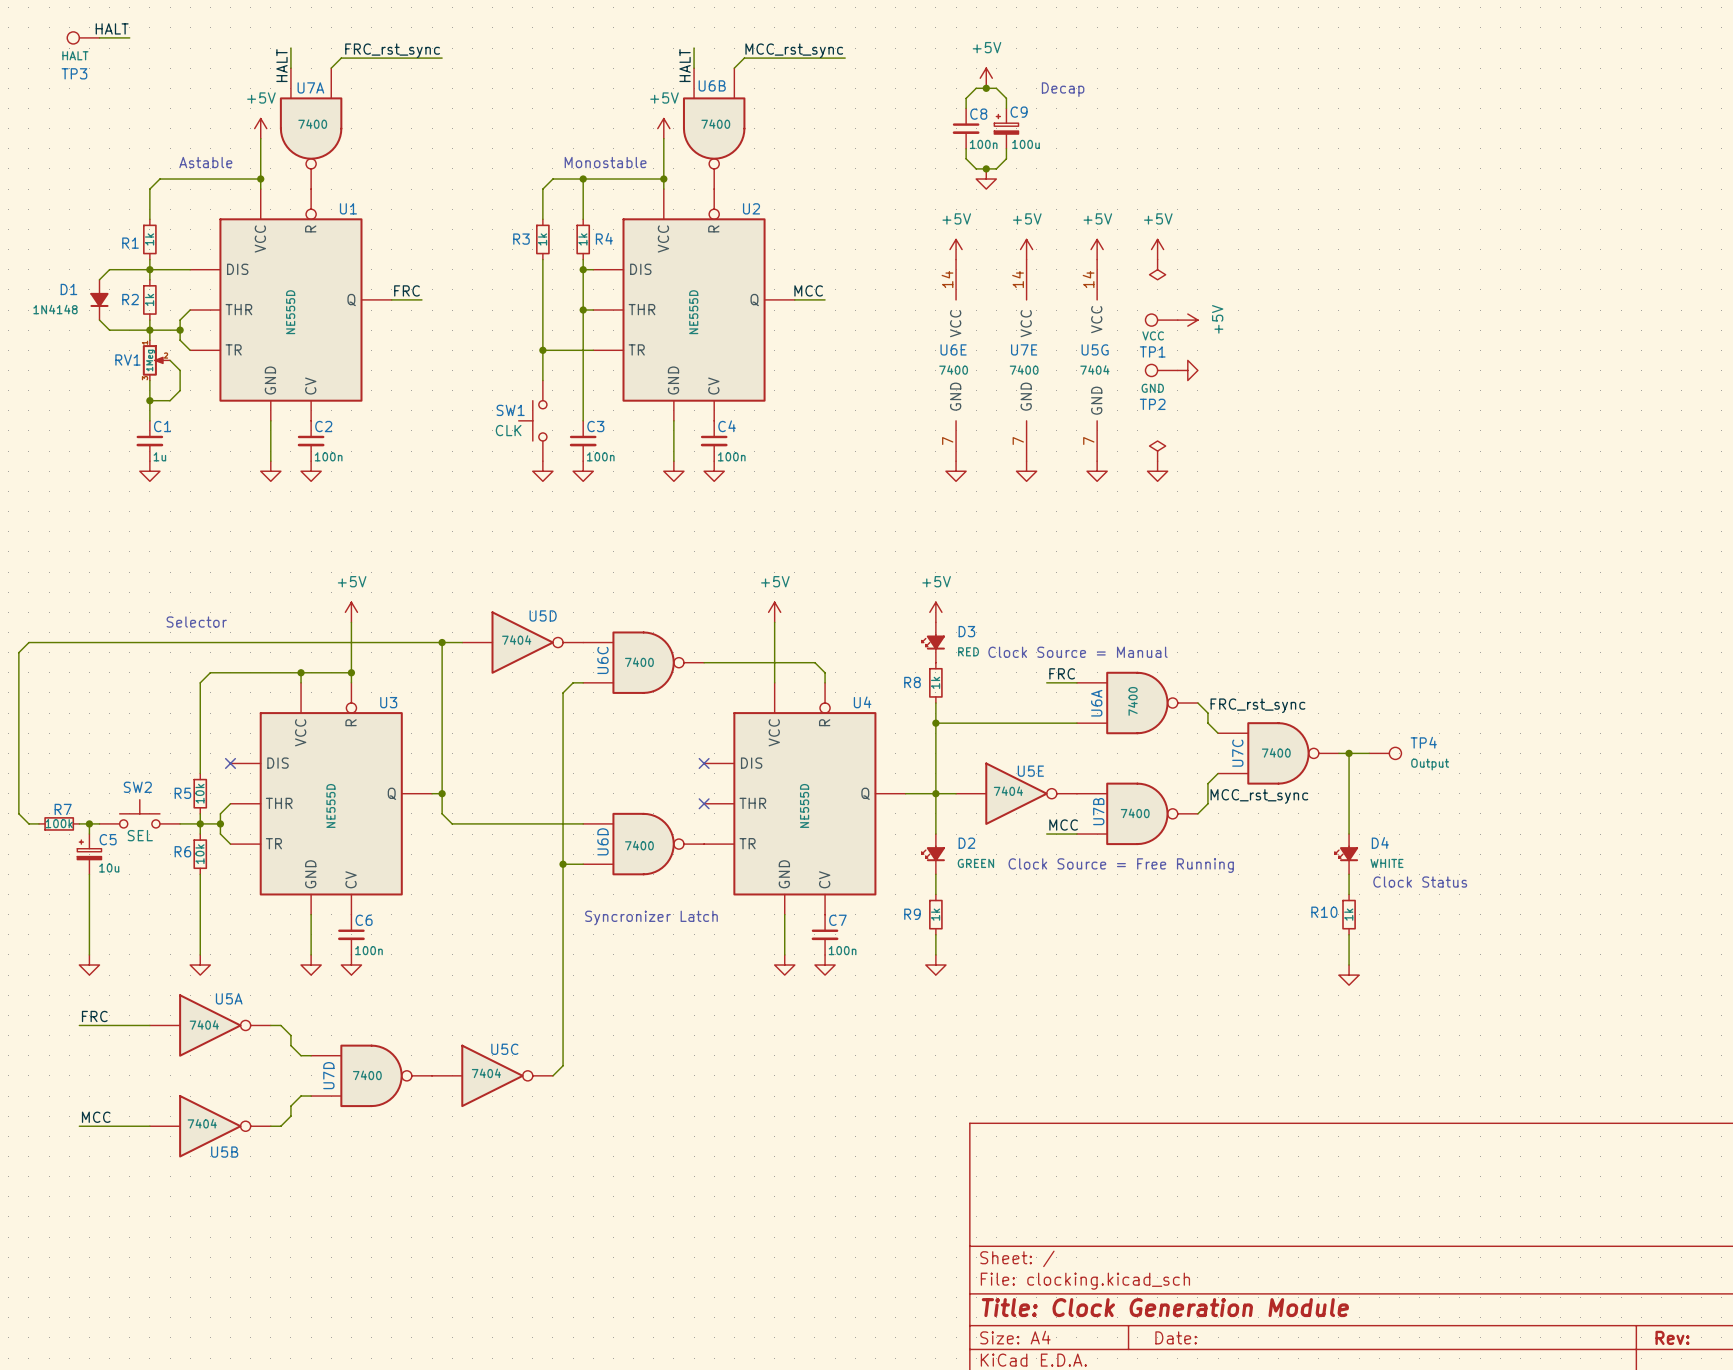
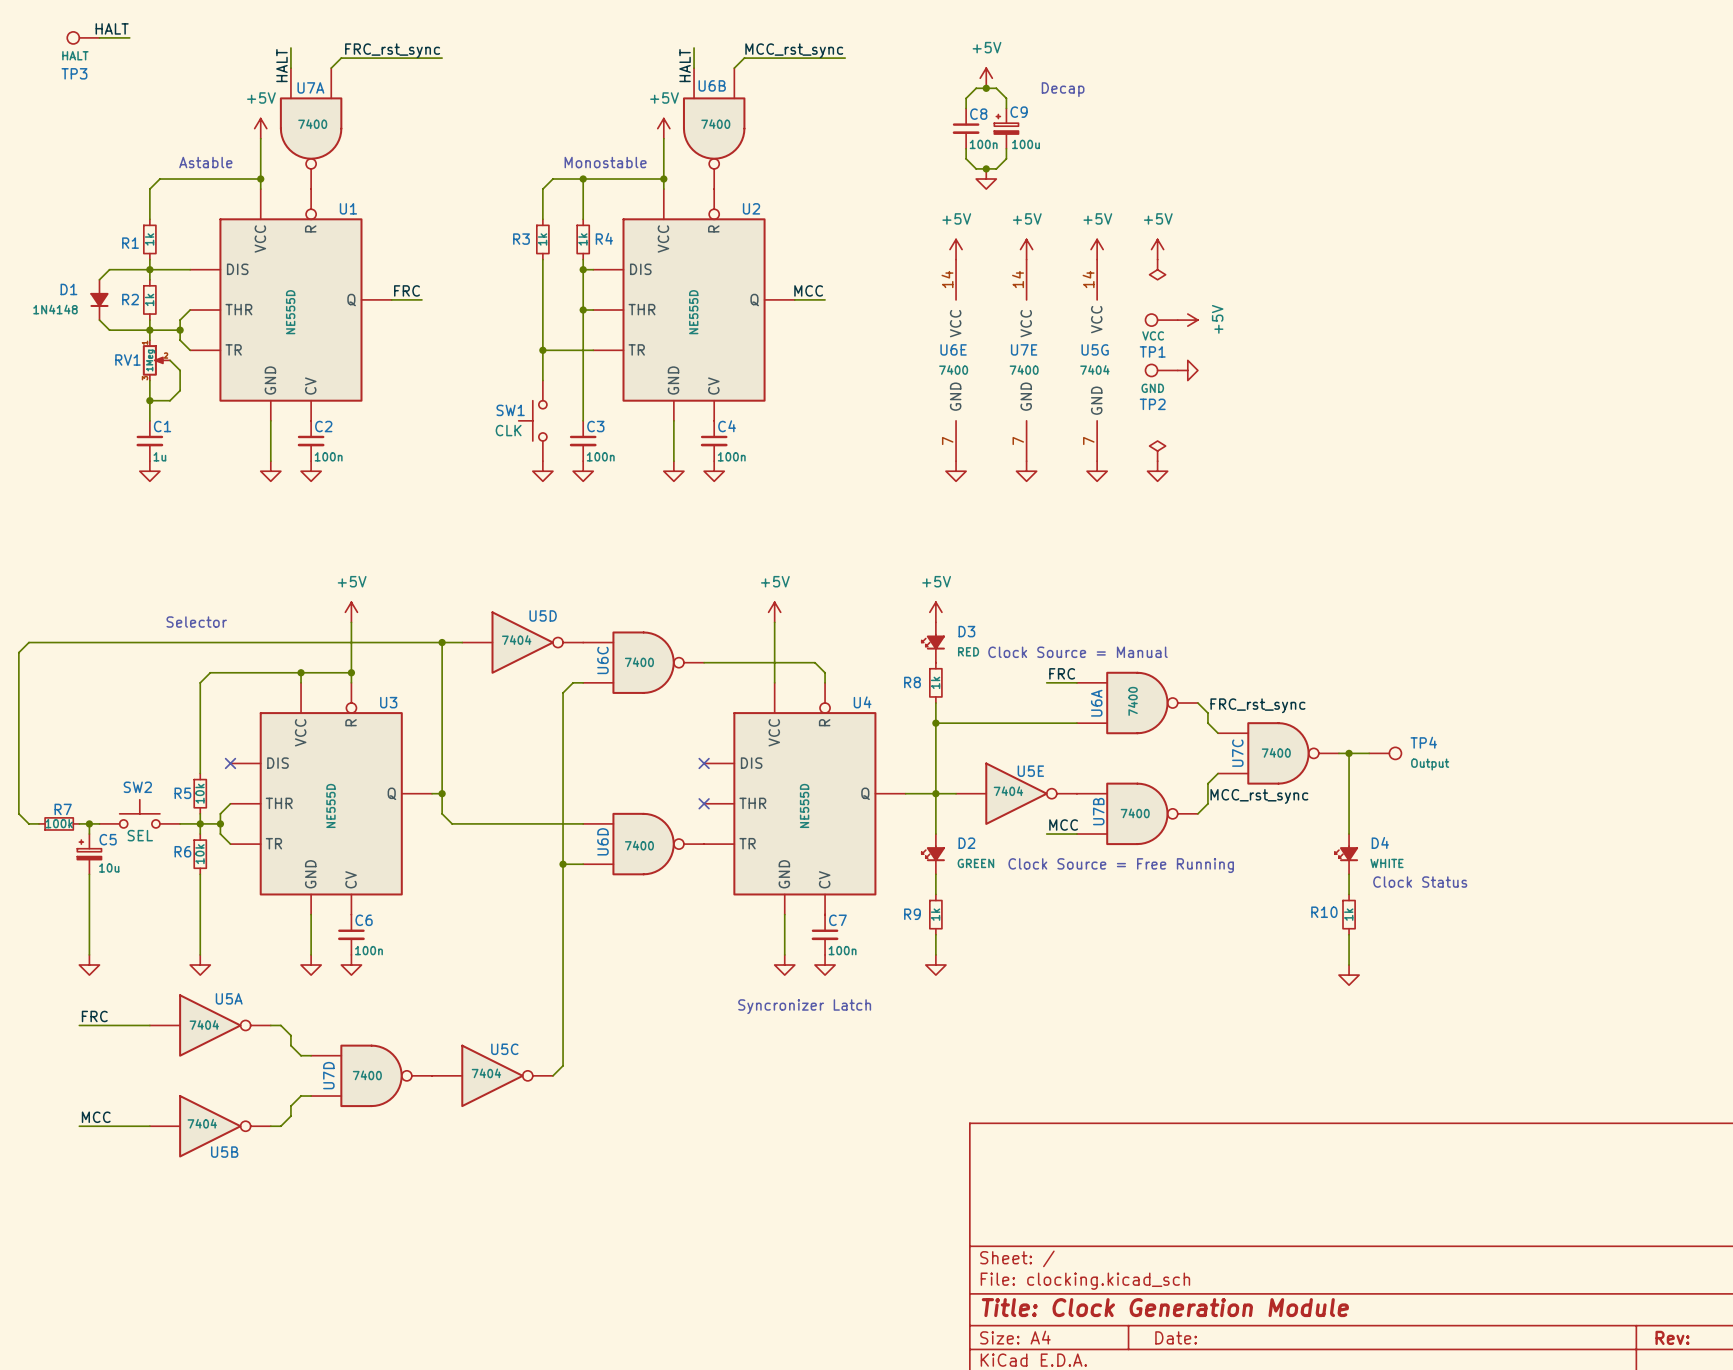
text position: Syncronizer Latch (651, 917) -> Syncronizer Latch (804, 1006)

